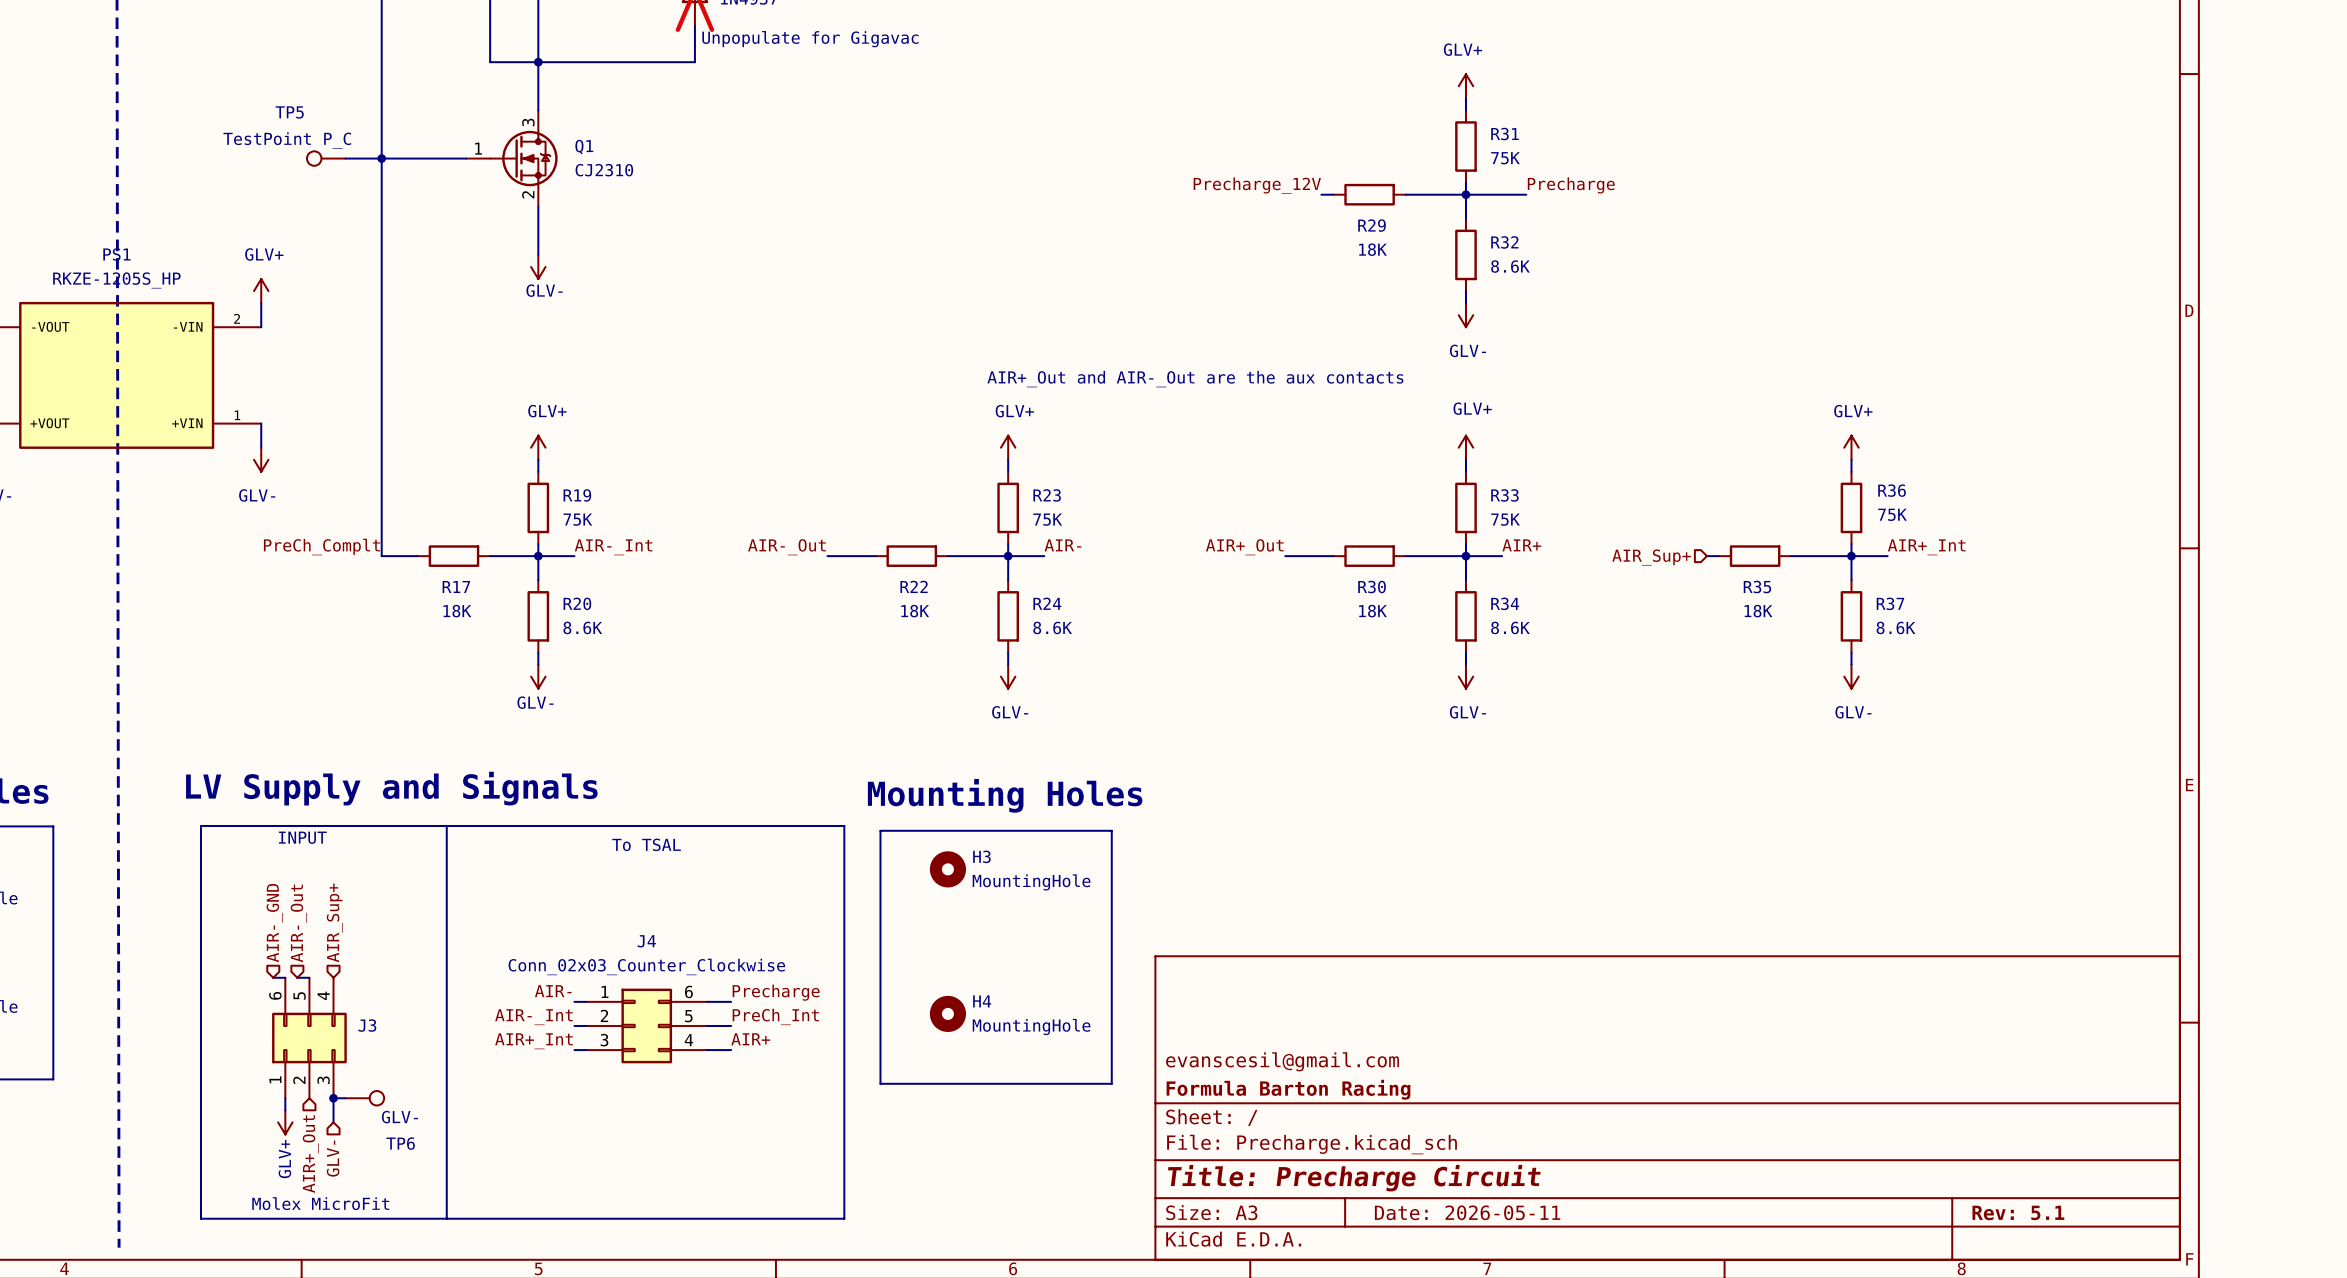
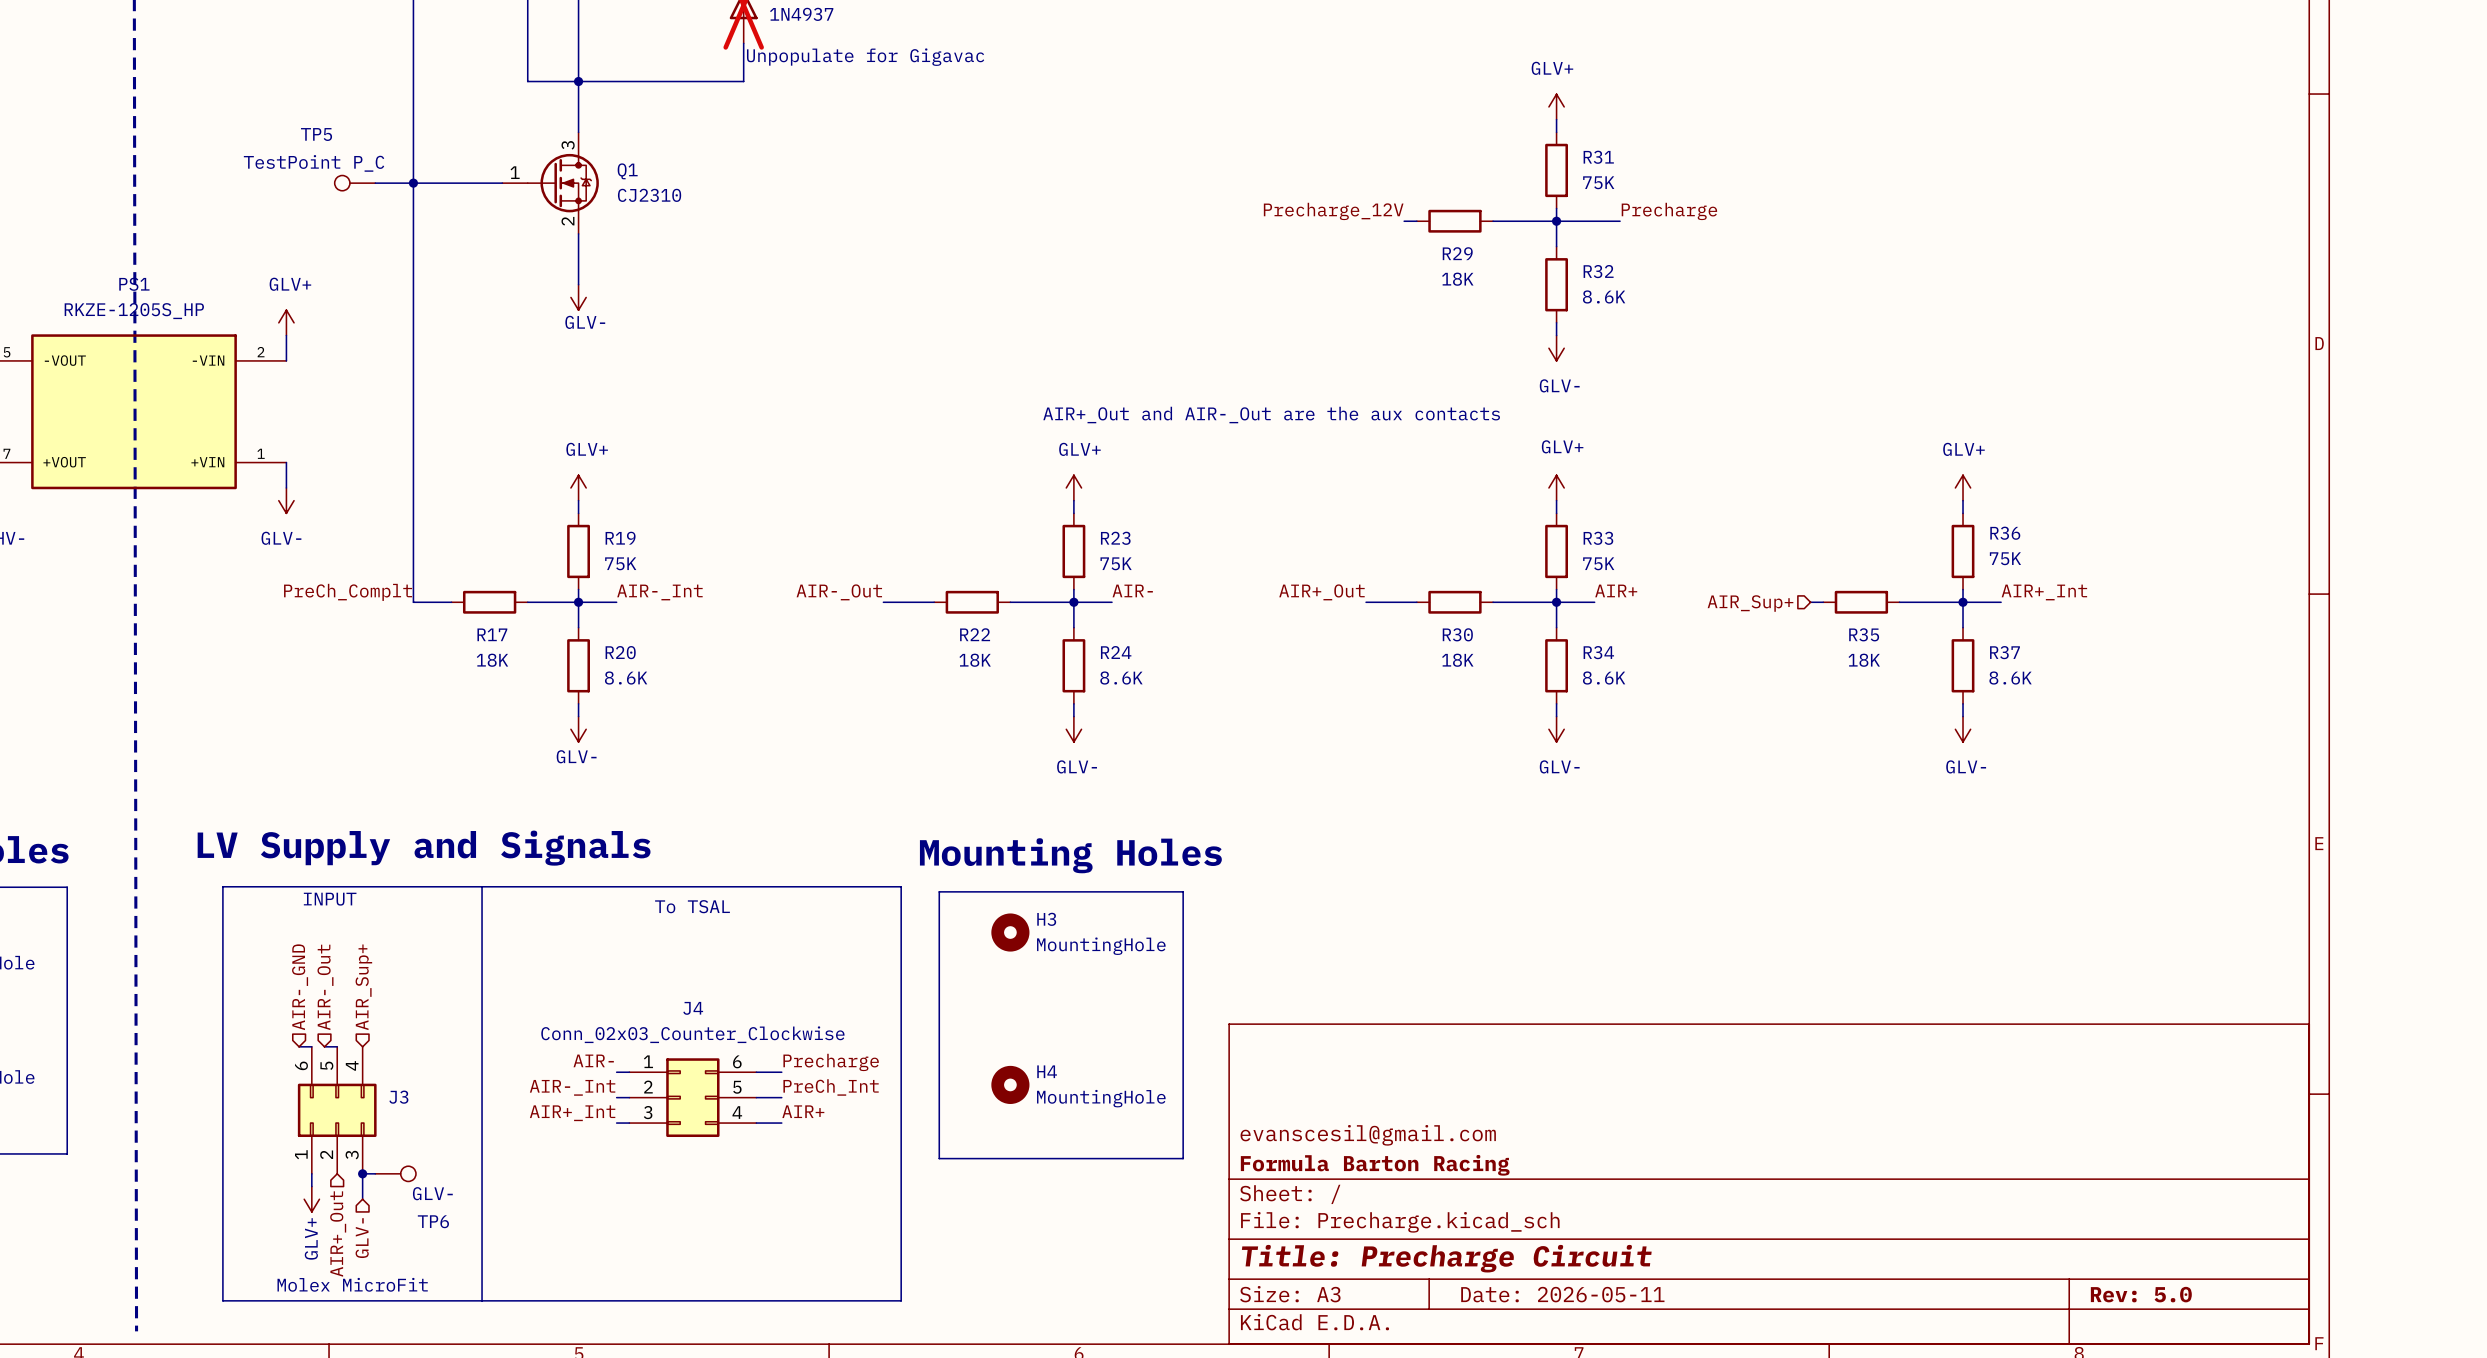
title block: Rev: 5.1 (2018, 1212) -> Rev: 5.0 (2141, 1294)

